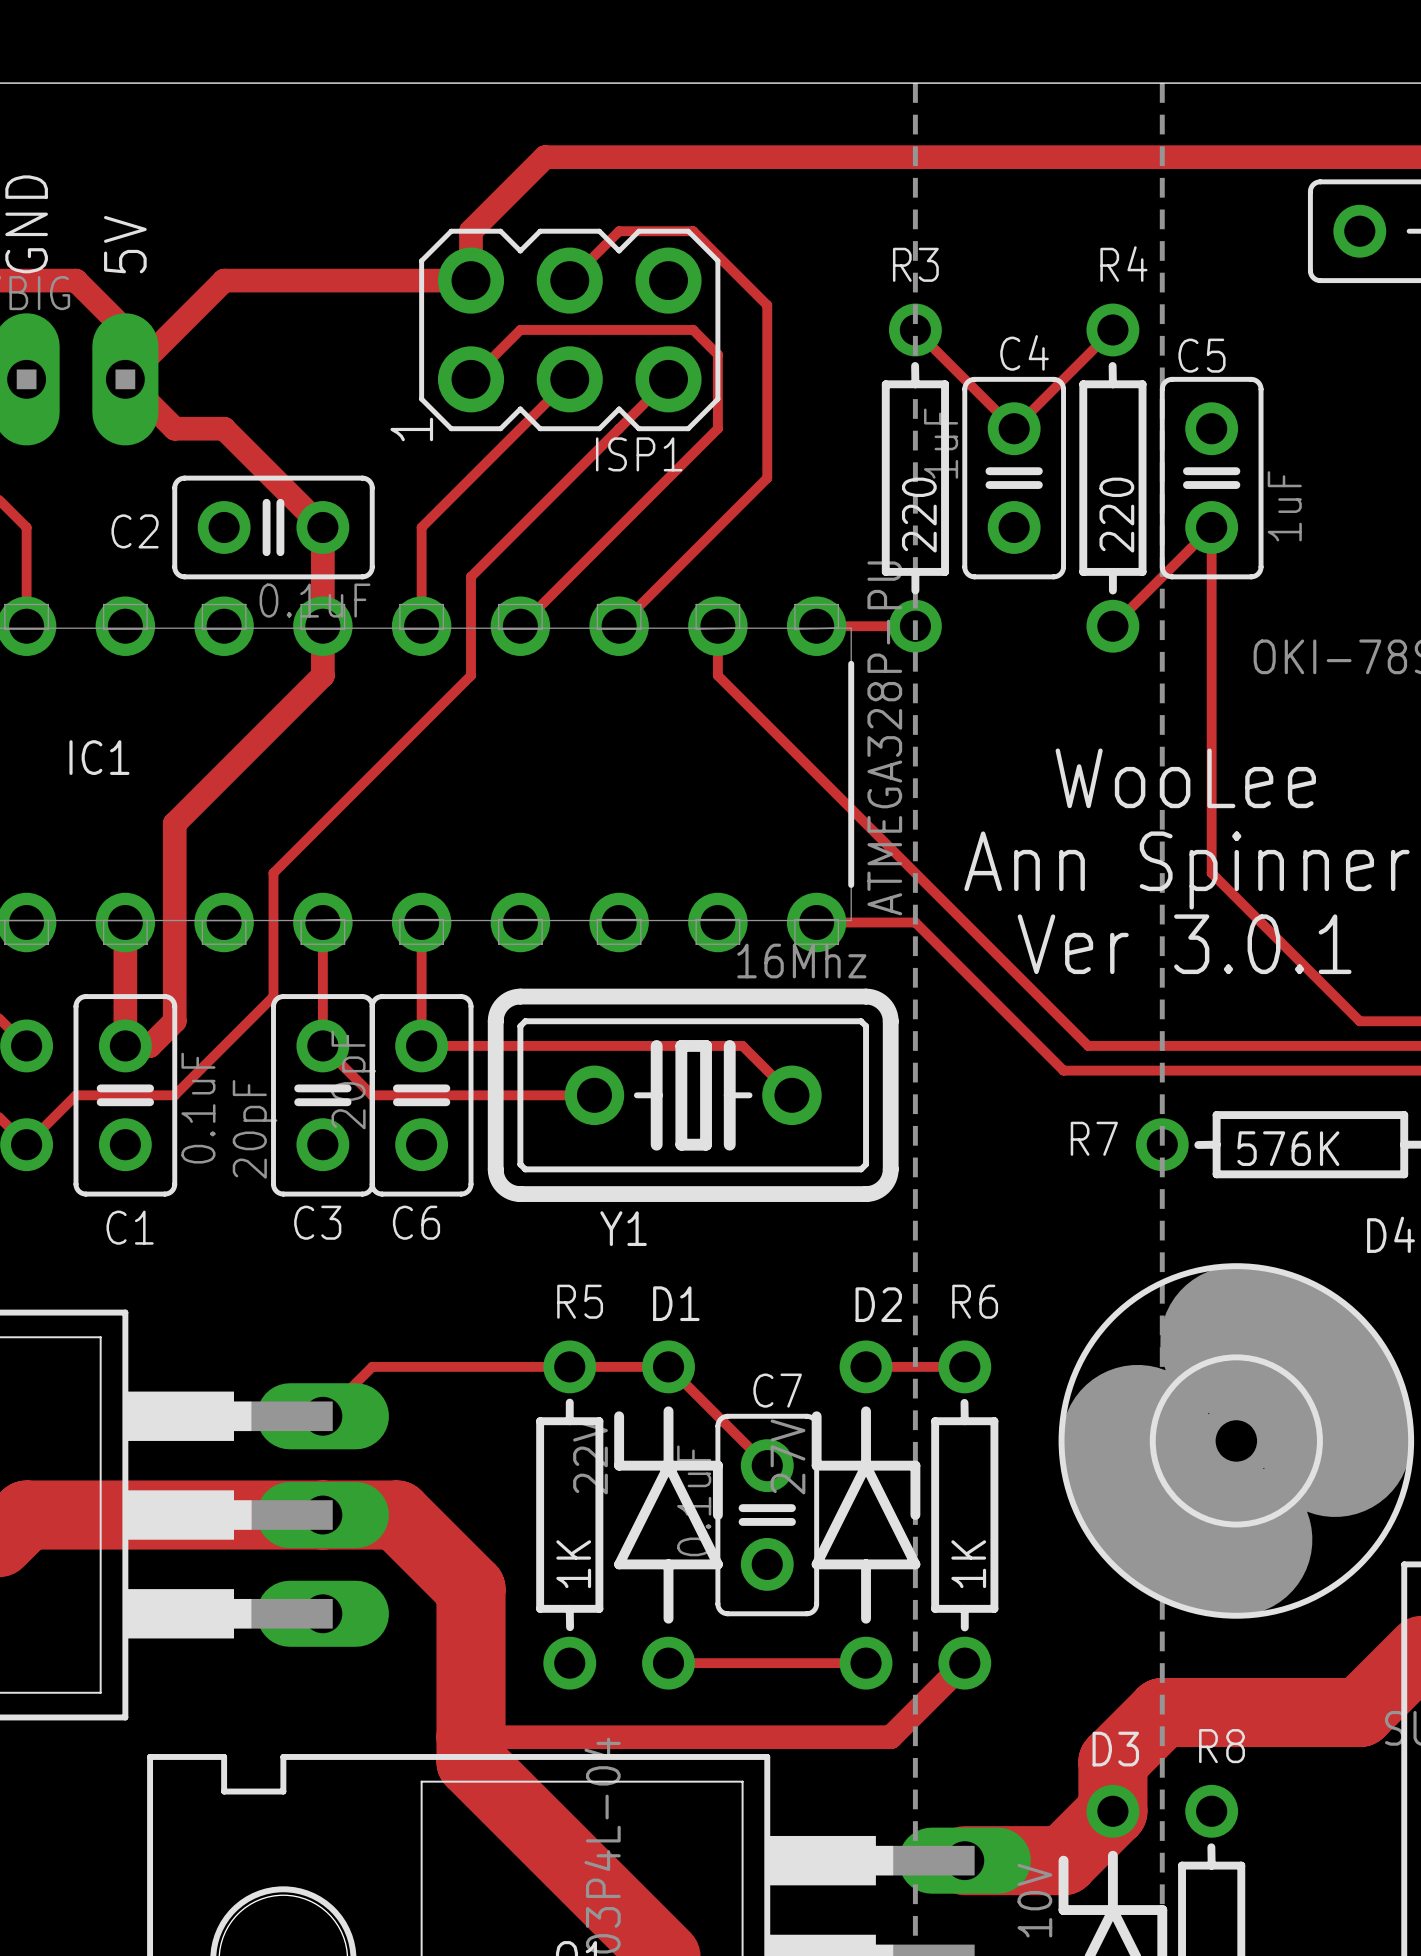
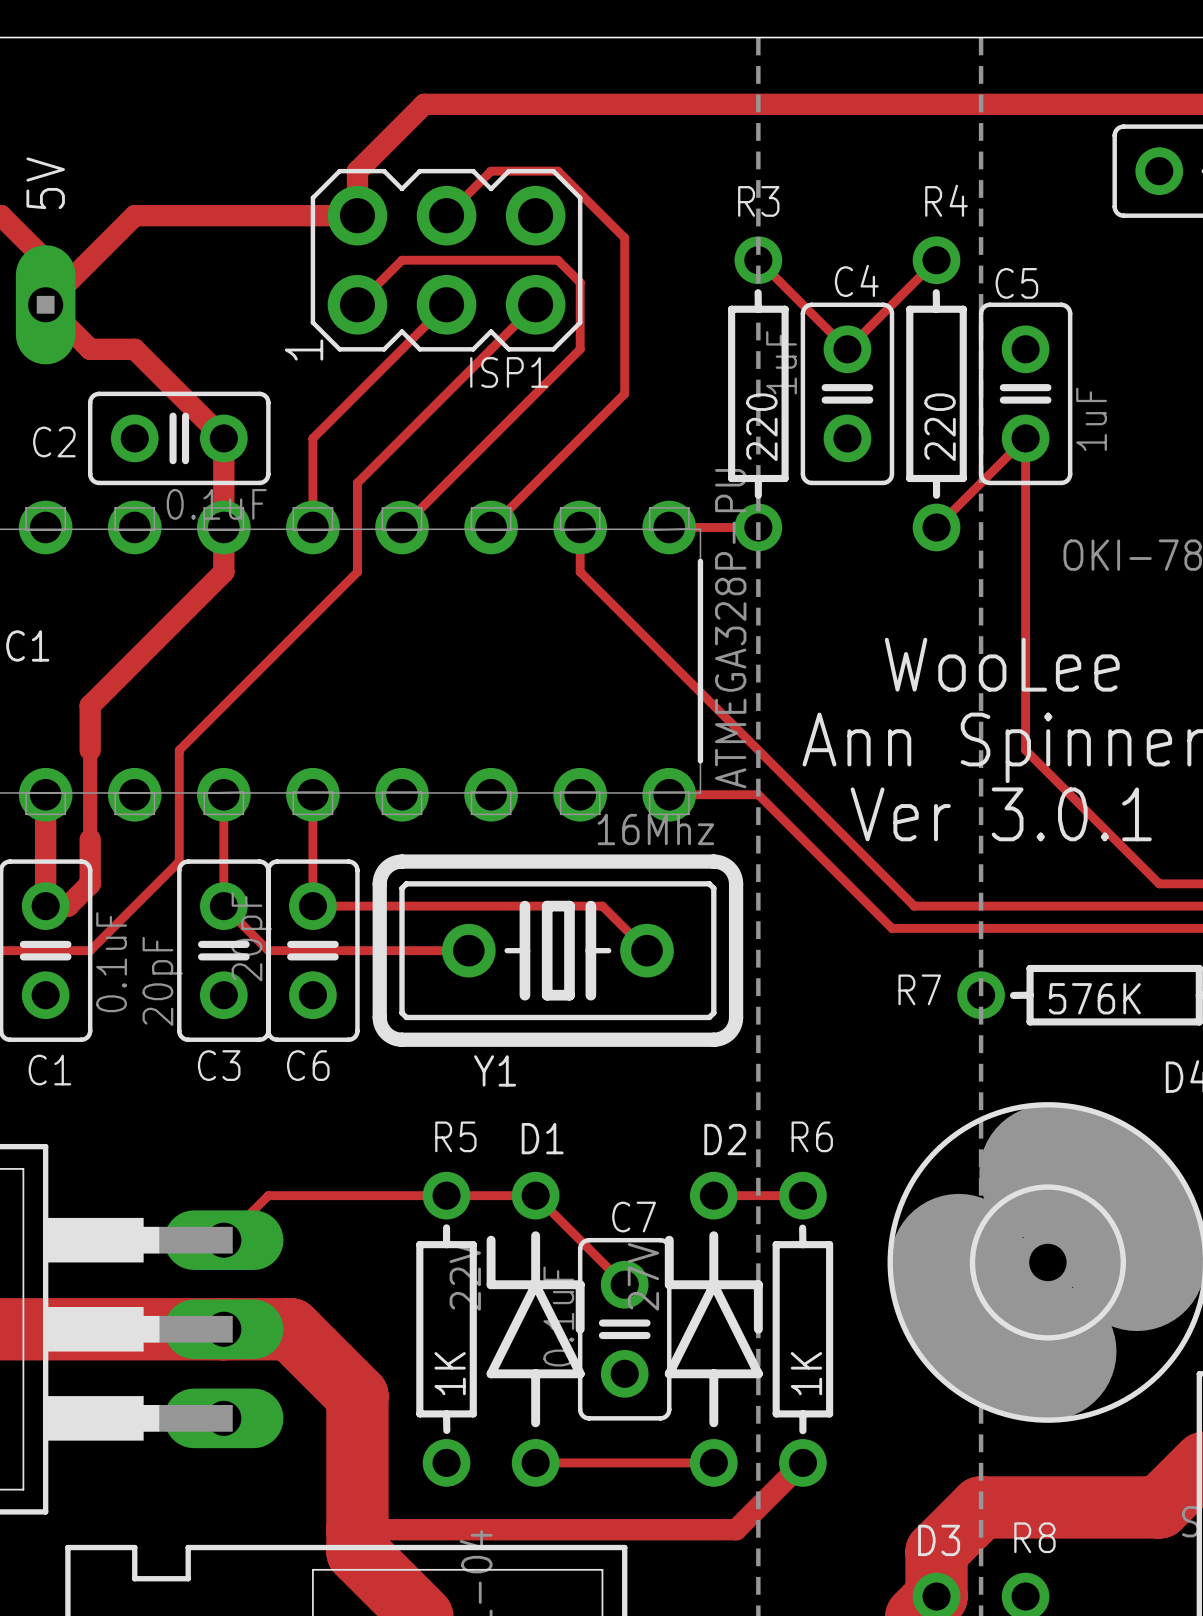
track width: thick (174, 873) (174, 971) -> thin (90, 750) (90, 839)

